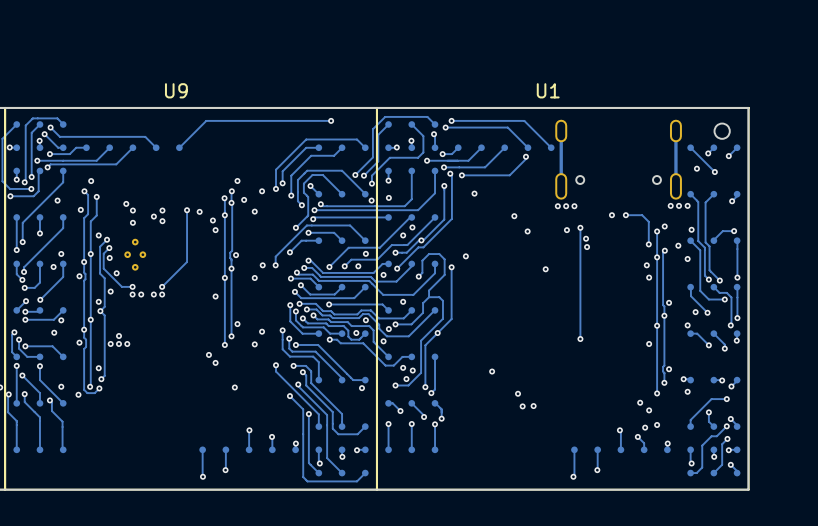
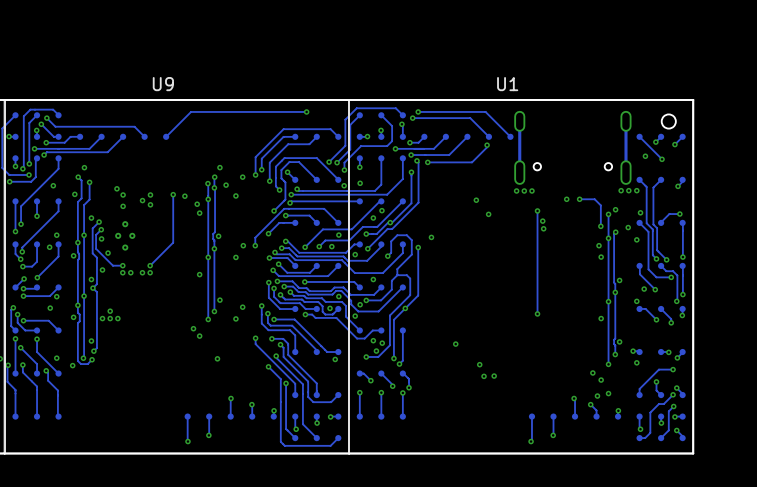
via: (474, 193) -> none
via: (566, 230) -> none
via: (545, 269) -> none

